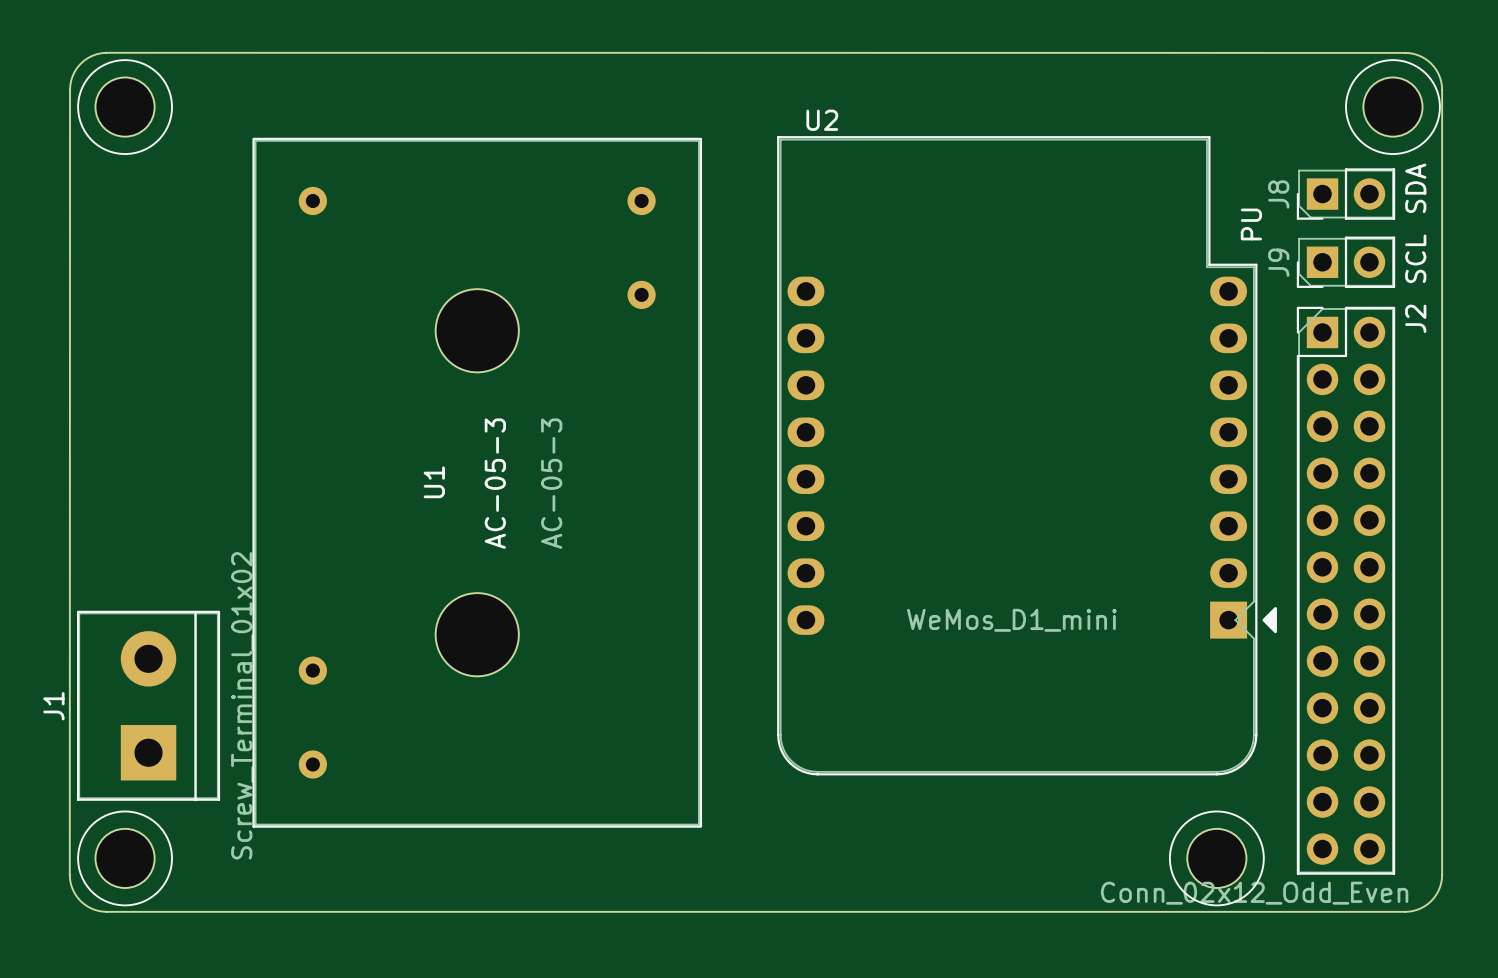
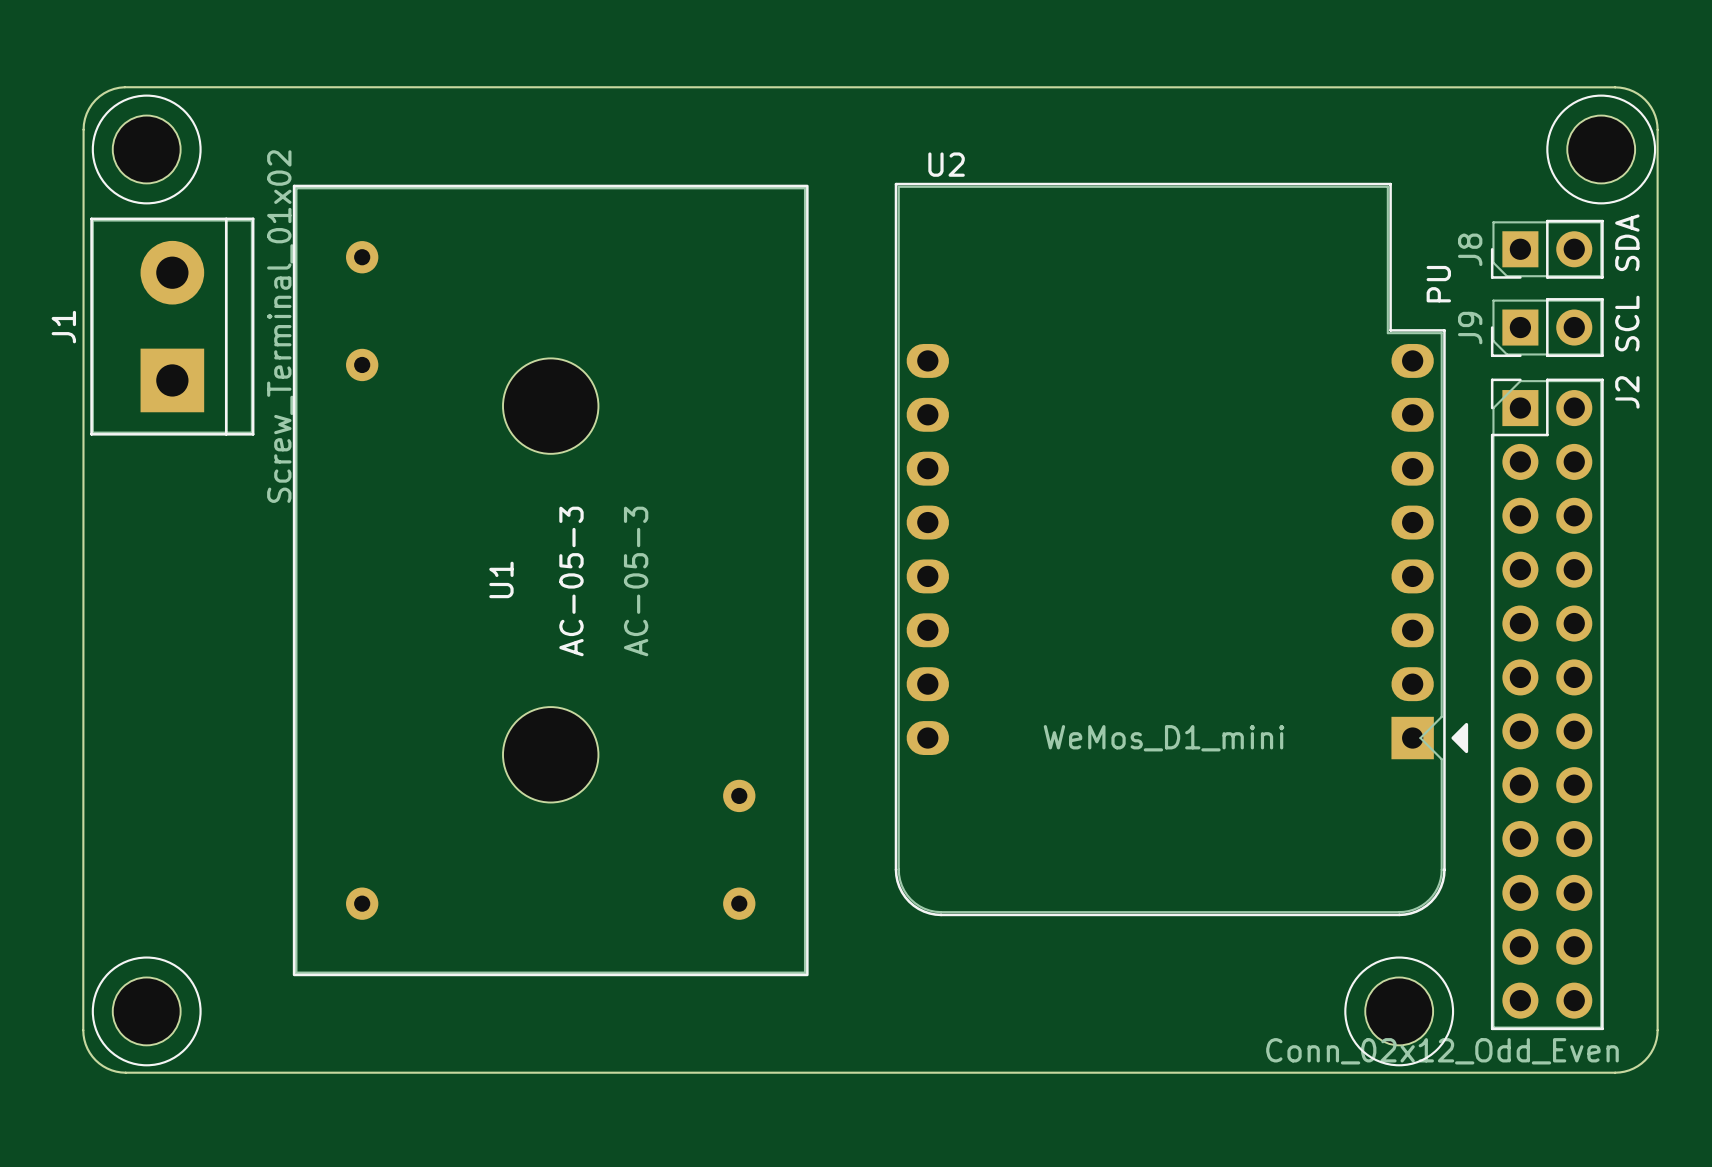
U1 footprint: [252, 137, 703, 828] -> [292, 184, 809, 977]
J1 position: (148, 705) -> (172, 326)

